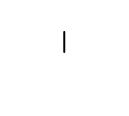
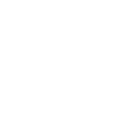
line: (64, 31) (64, 52) -> none

